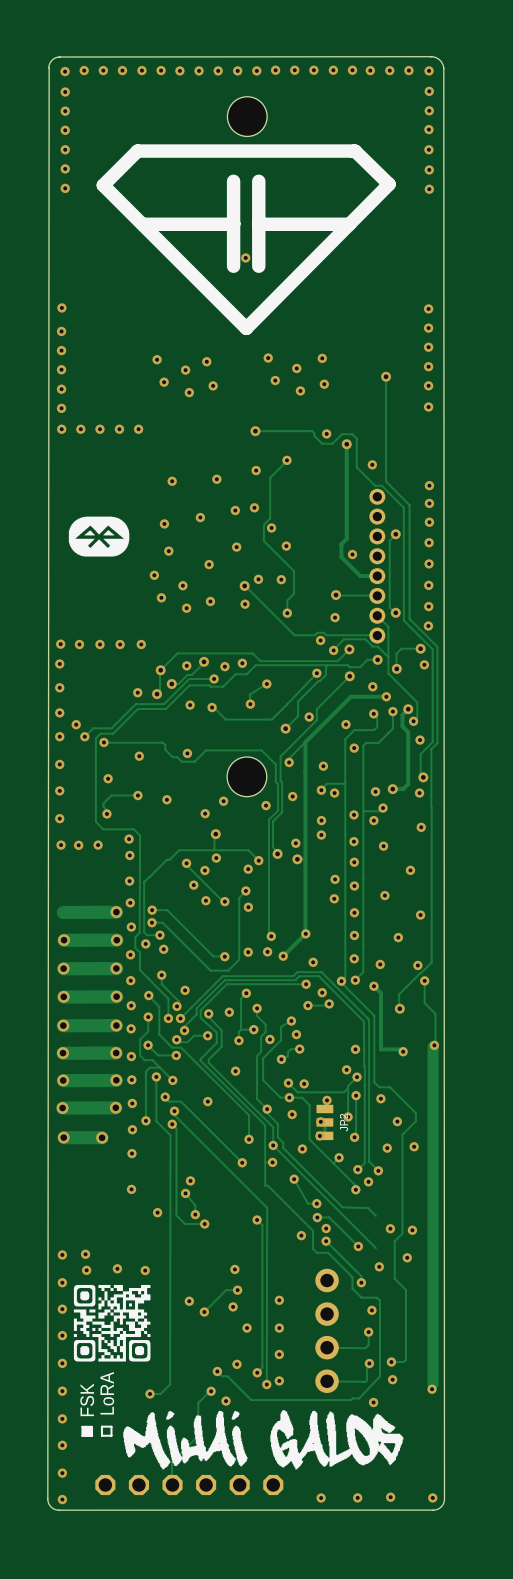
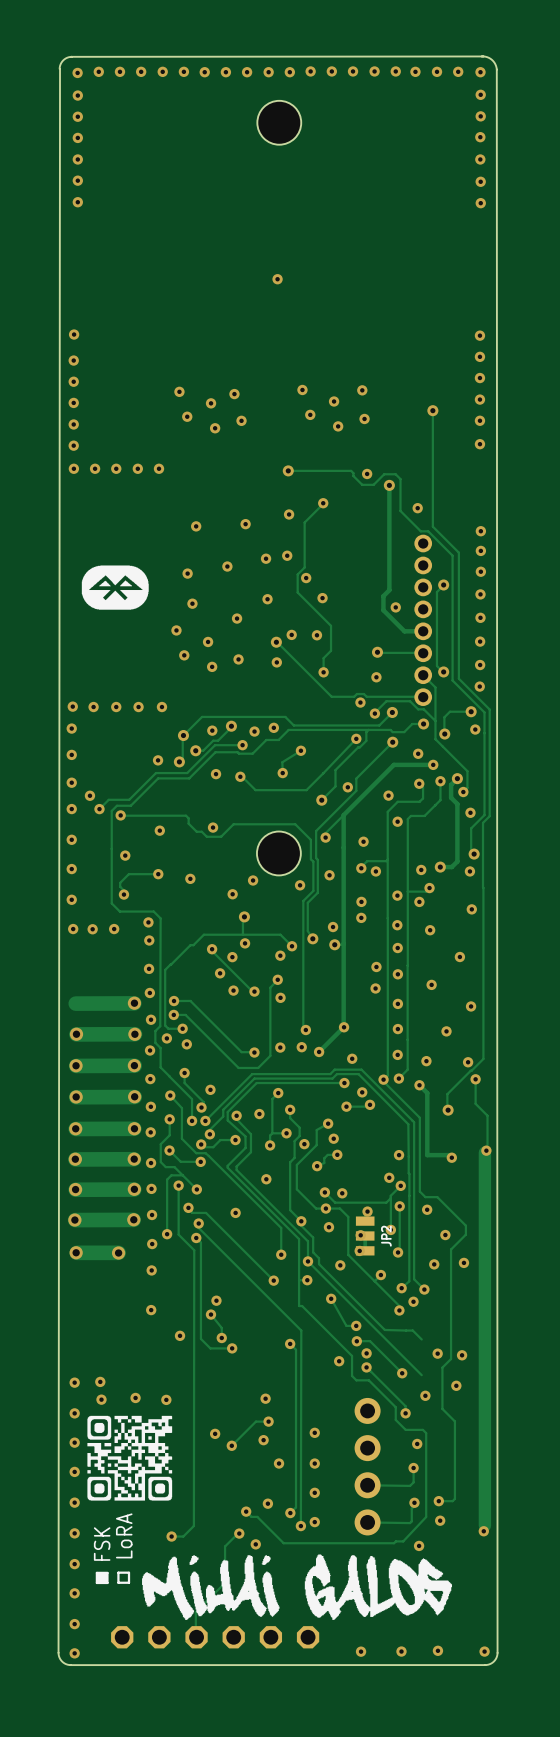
line: (355, 151) (137, 151) (103, 185) (246, 328) (389, 184) (355, 151) (352, 151) -> none
line: (233, 181) (233, 266) -> none
line: (258, 181) (258, 266) -> none
line: (233, 224) (142, 224) -> none
line: (349, 224) (258, 224) -> none

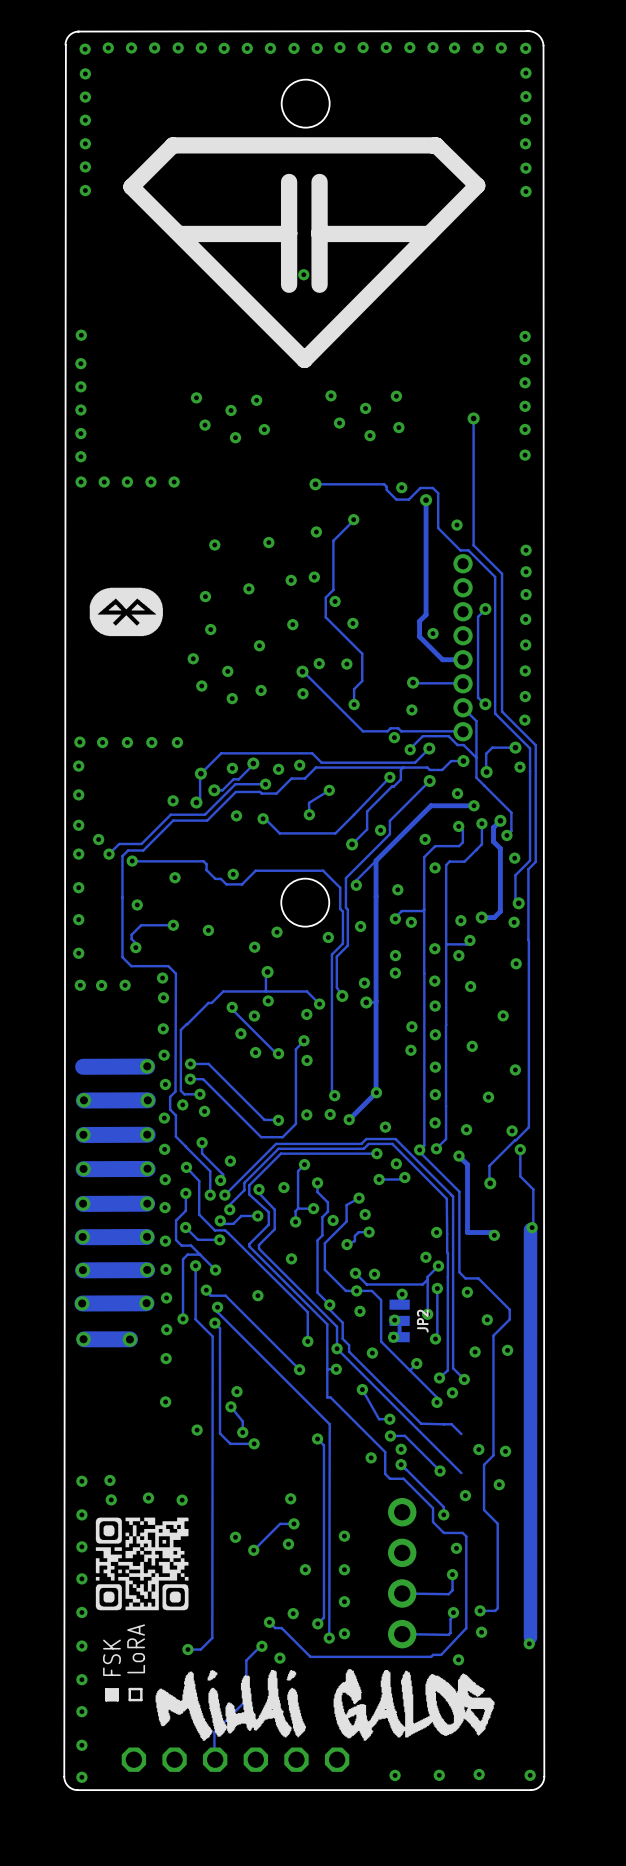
line: none -> (436, 145) (172, 145) (131, 186) (304, 359) (477, 185) (436, 145) (433, 145)
line: none -> (289, 181) (289, 284)
line: none -> (319, 181) (319, 284)
line: none -> (289, 233) (179, 233)
line: none -> (429, 233) (319, 233)

